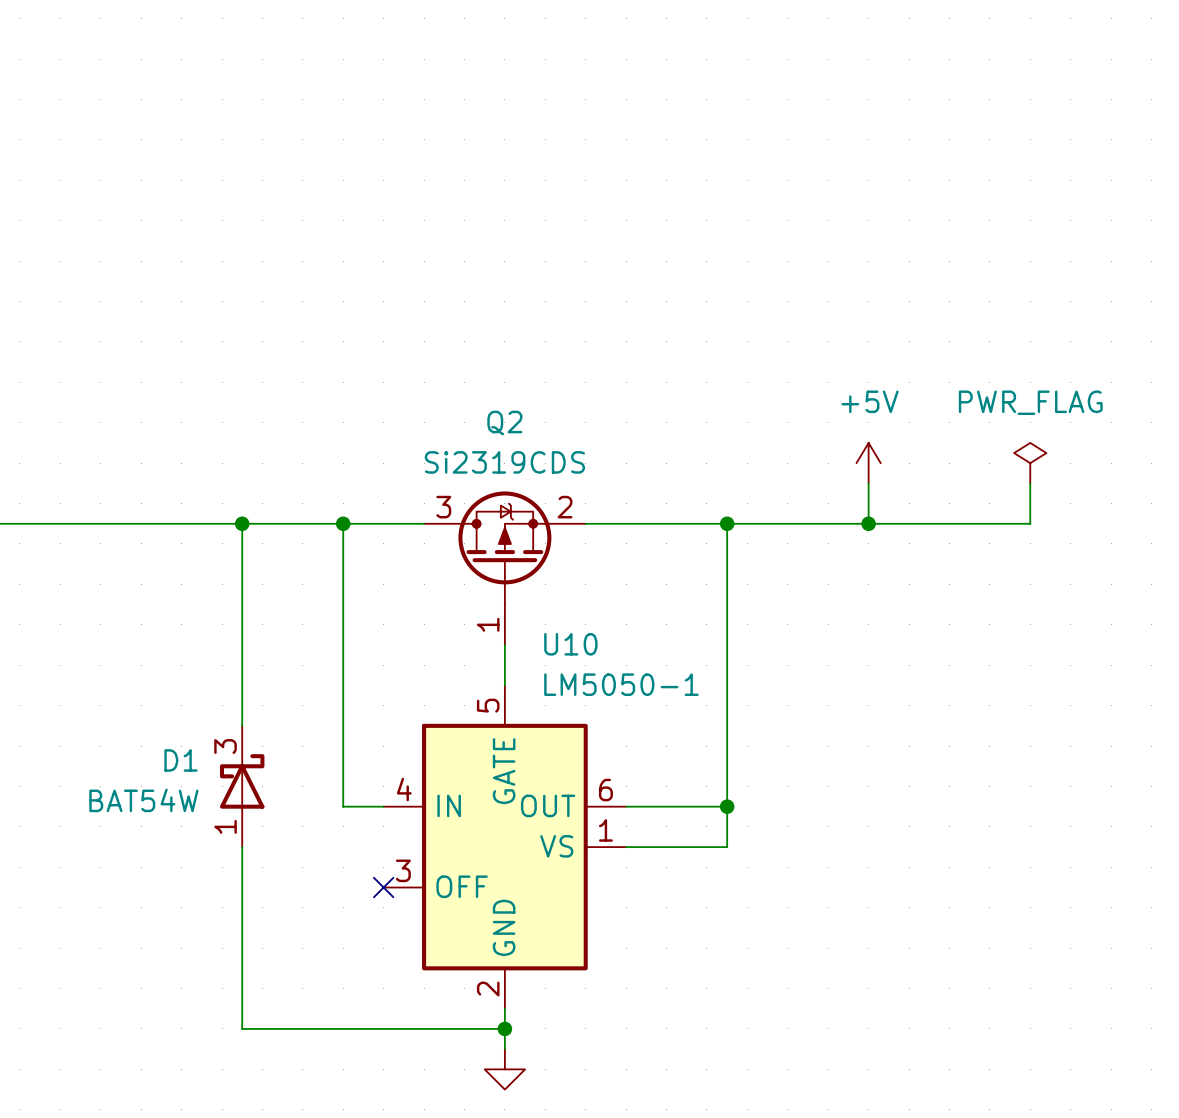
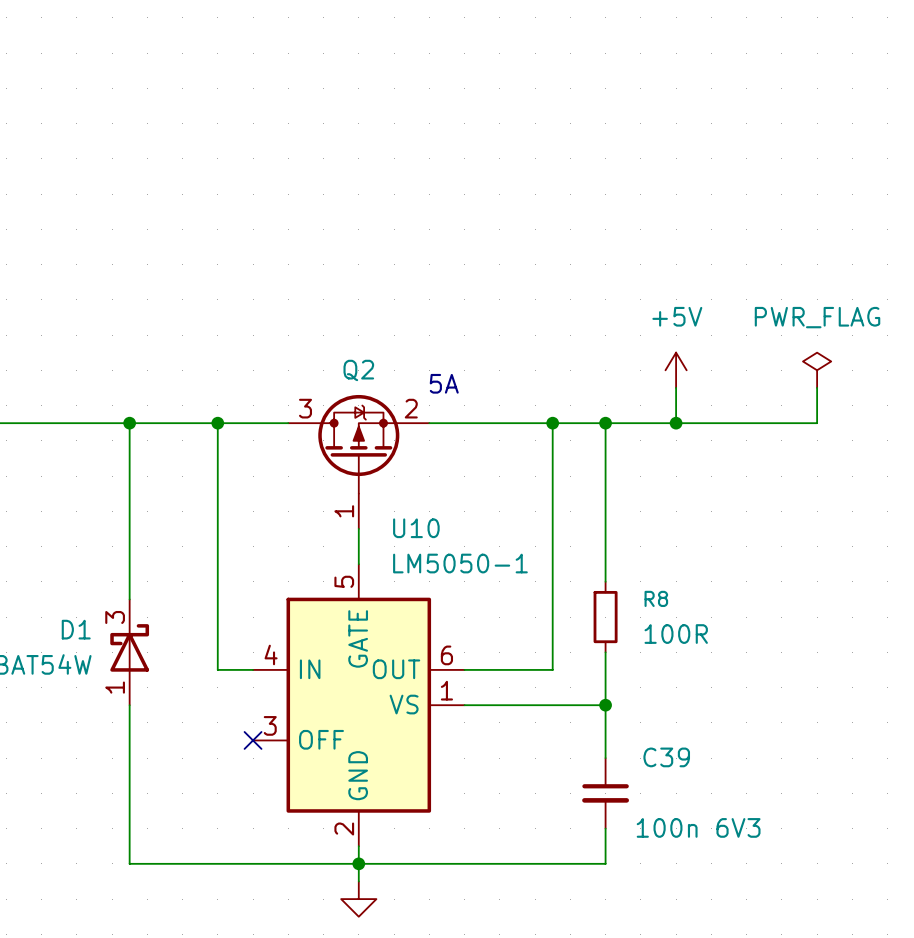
Q2 name position: Q2 (504, 422) -> Q2 (358, 370)
Q2 value: Si2319CDS (504, 462) -> none
text: none -> 5A (444, 383)
wire: none -> (605, 423) (605, 581)
junction: none -> (605, 423)
R8: none -> 100R (605, 617)
wire: none -> (605, 652) (605, 758)
wire: (727, 806) (727, 847) -> (605, 705) (552, 705)
junction position: (727, 806) -> (605, 705)
C39: none -> 100n 6V3 (605, 793)
wire: none -> (605, 828) (605, 863) (358, 863)

